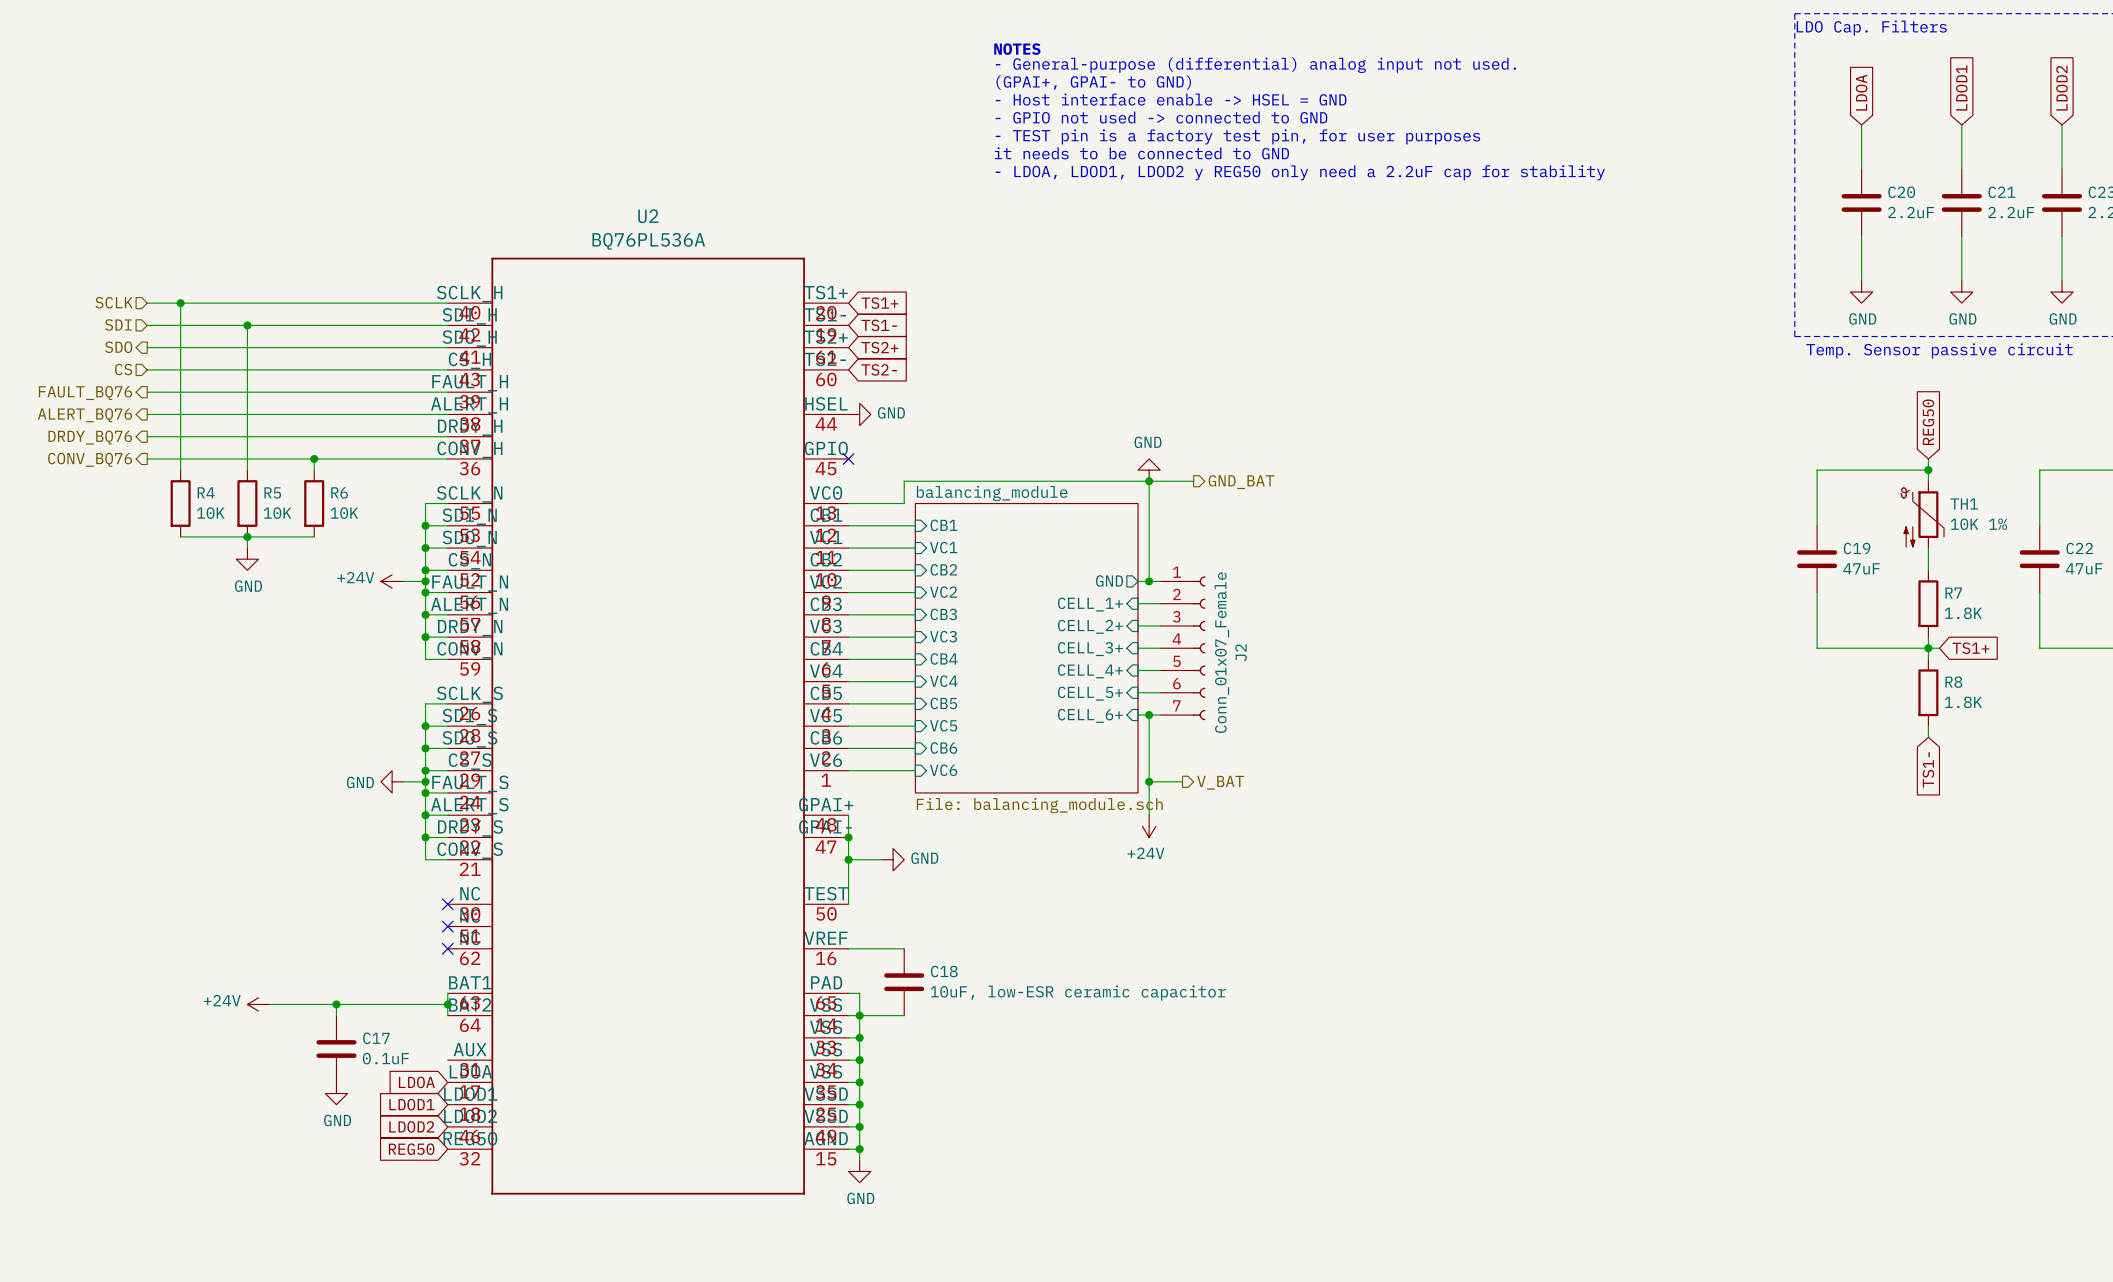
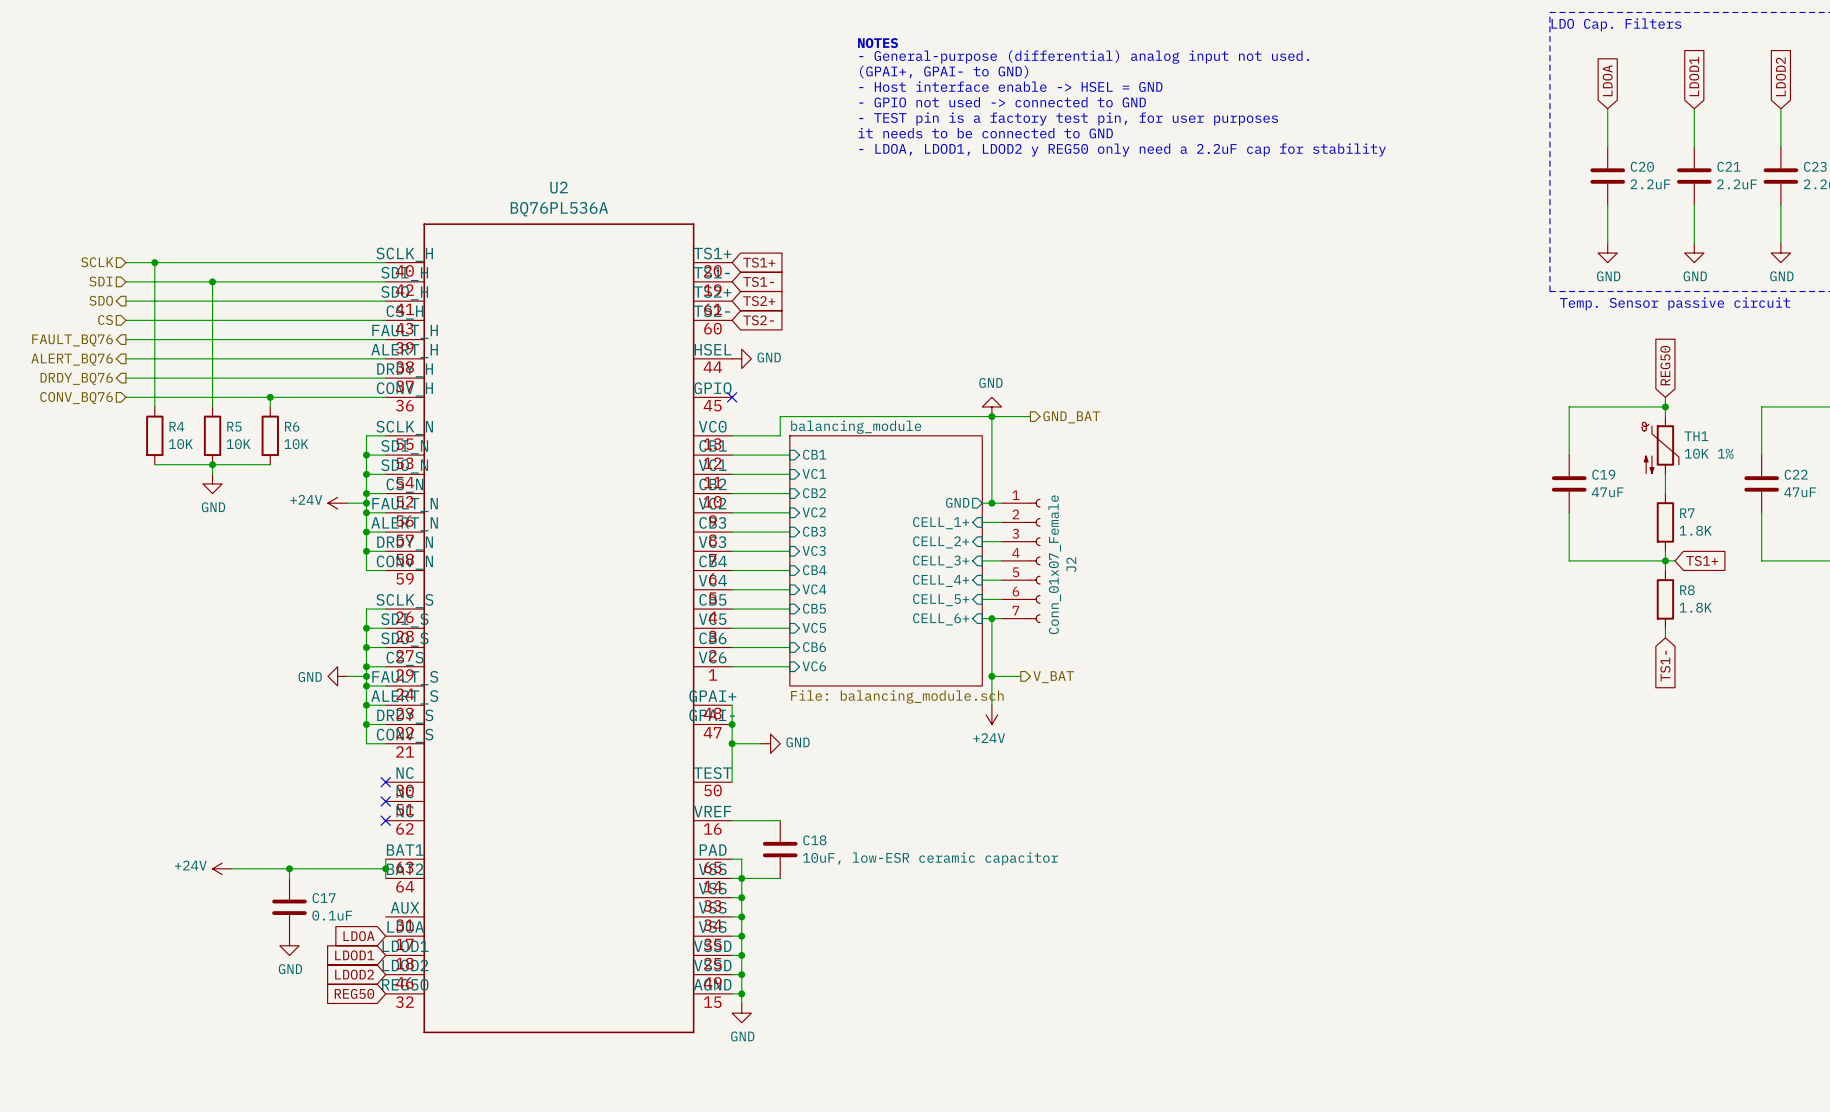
hierarchical label shape: output (90, 459) -> input (76, 398)

